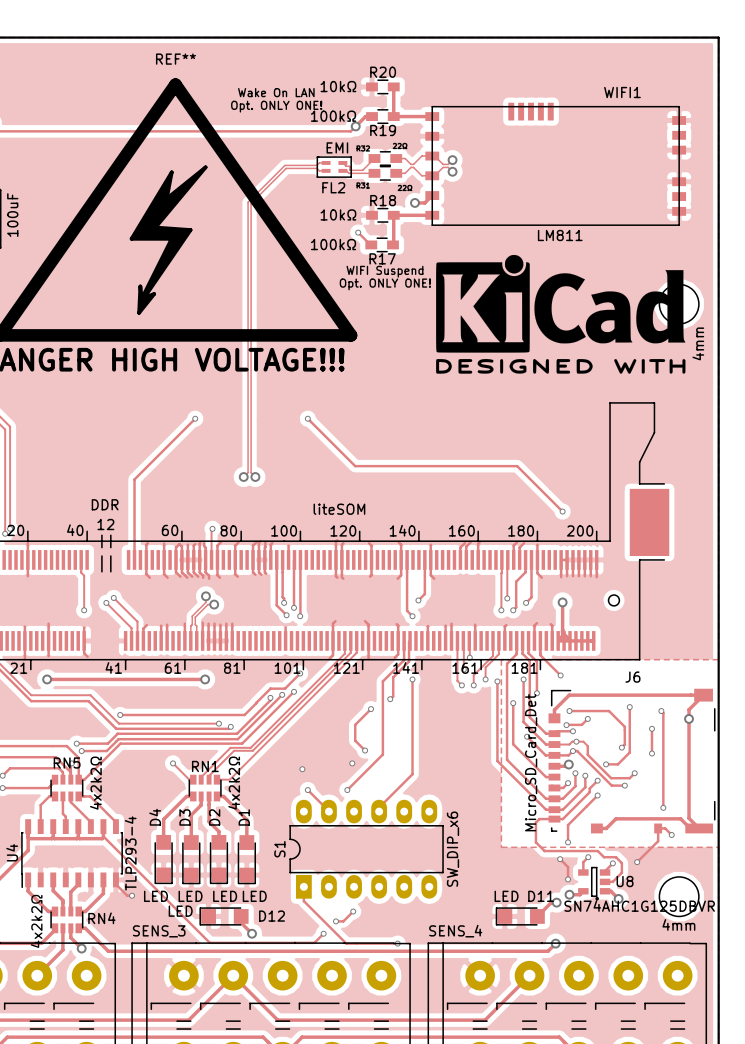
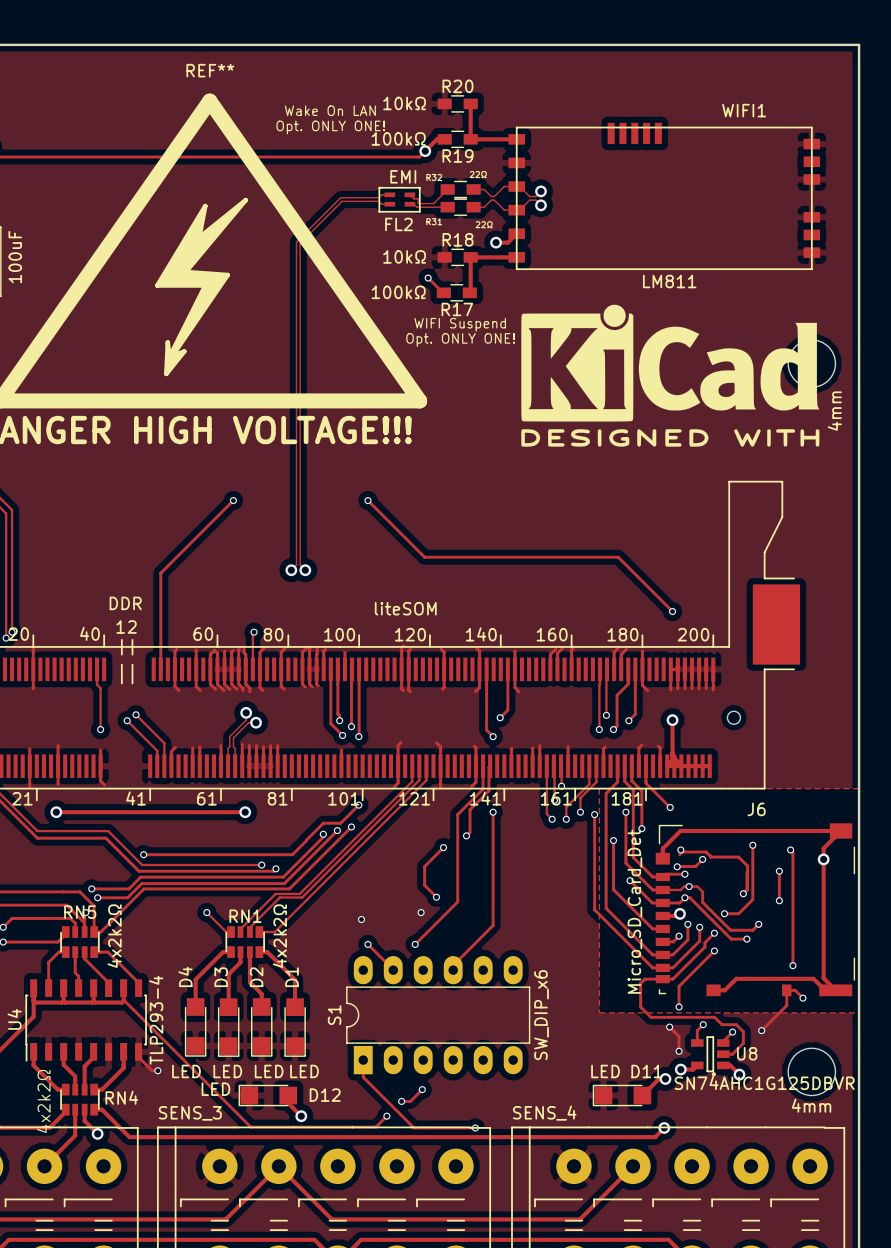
track: (569, 711) (609, 711) (624, 726) (624, 729) -> none
track: none -> (679, 854) (682, 852) (706, 852) (710, 857) (738, 857) (747, 865) (746, 890)

